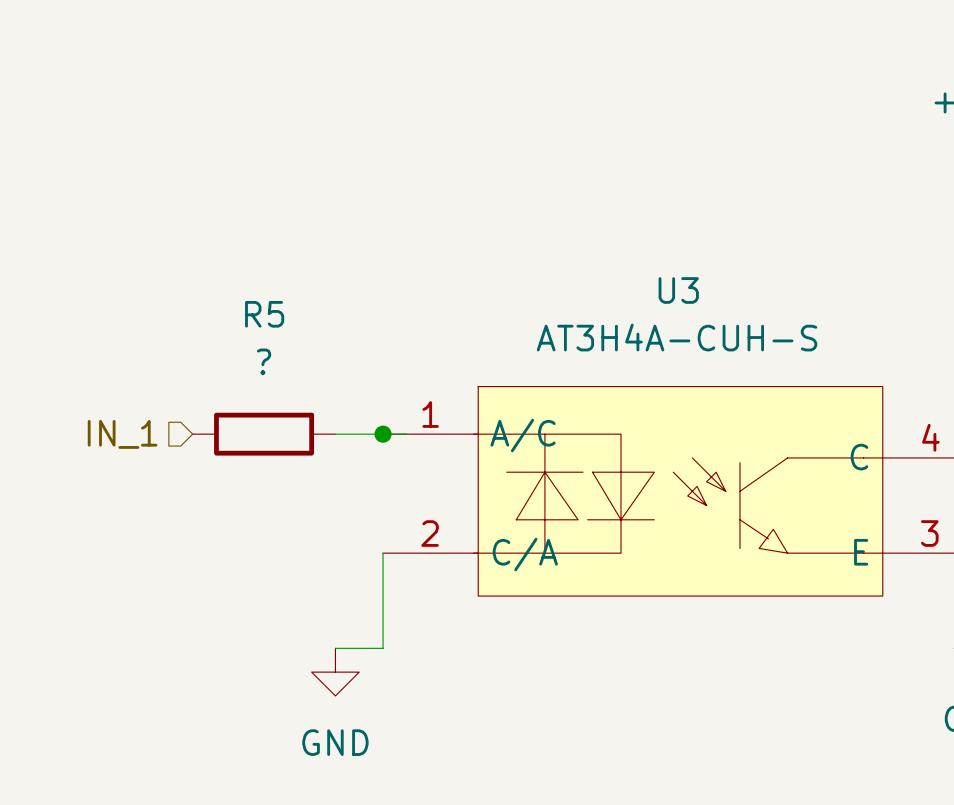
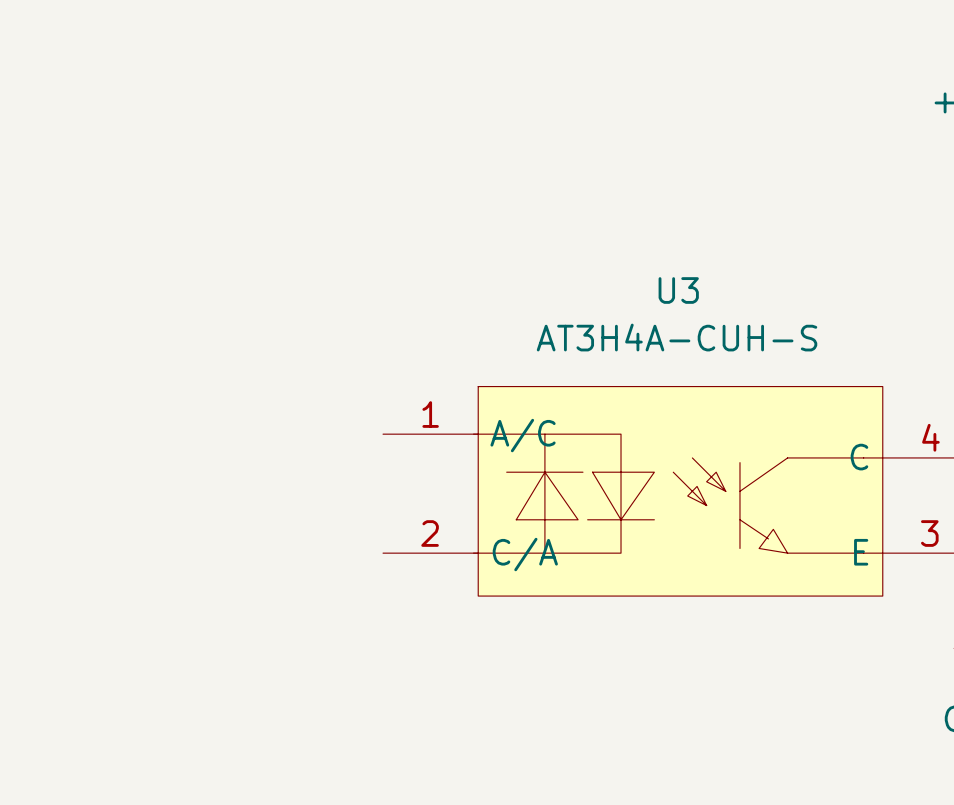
hierarchical label: IN_1 (122, 434) -> none
R5: ? (264, 434) -> none
wire: (335, 434) (406, 434) -> none
junction: (383, 434) -> none
wire: (383, 553) (383, 648) (335, 648) -> none
power symbol: GND (335, 672) -> none

